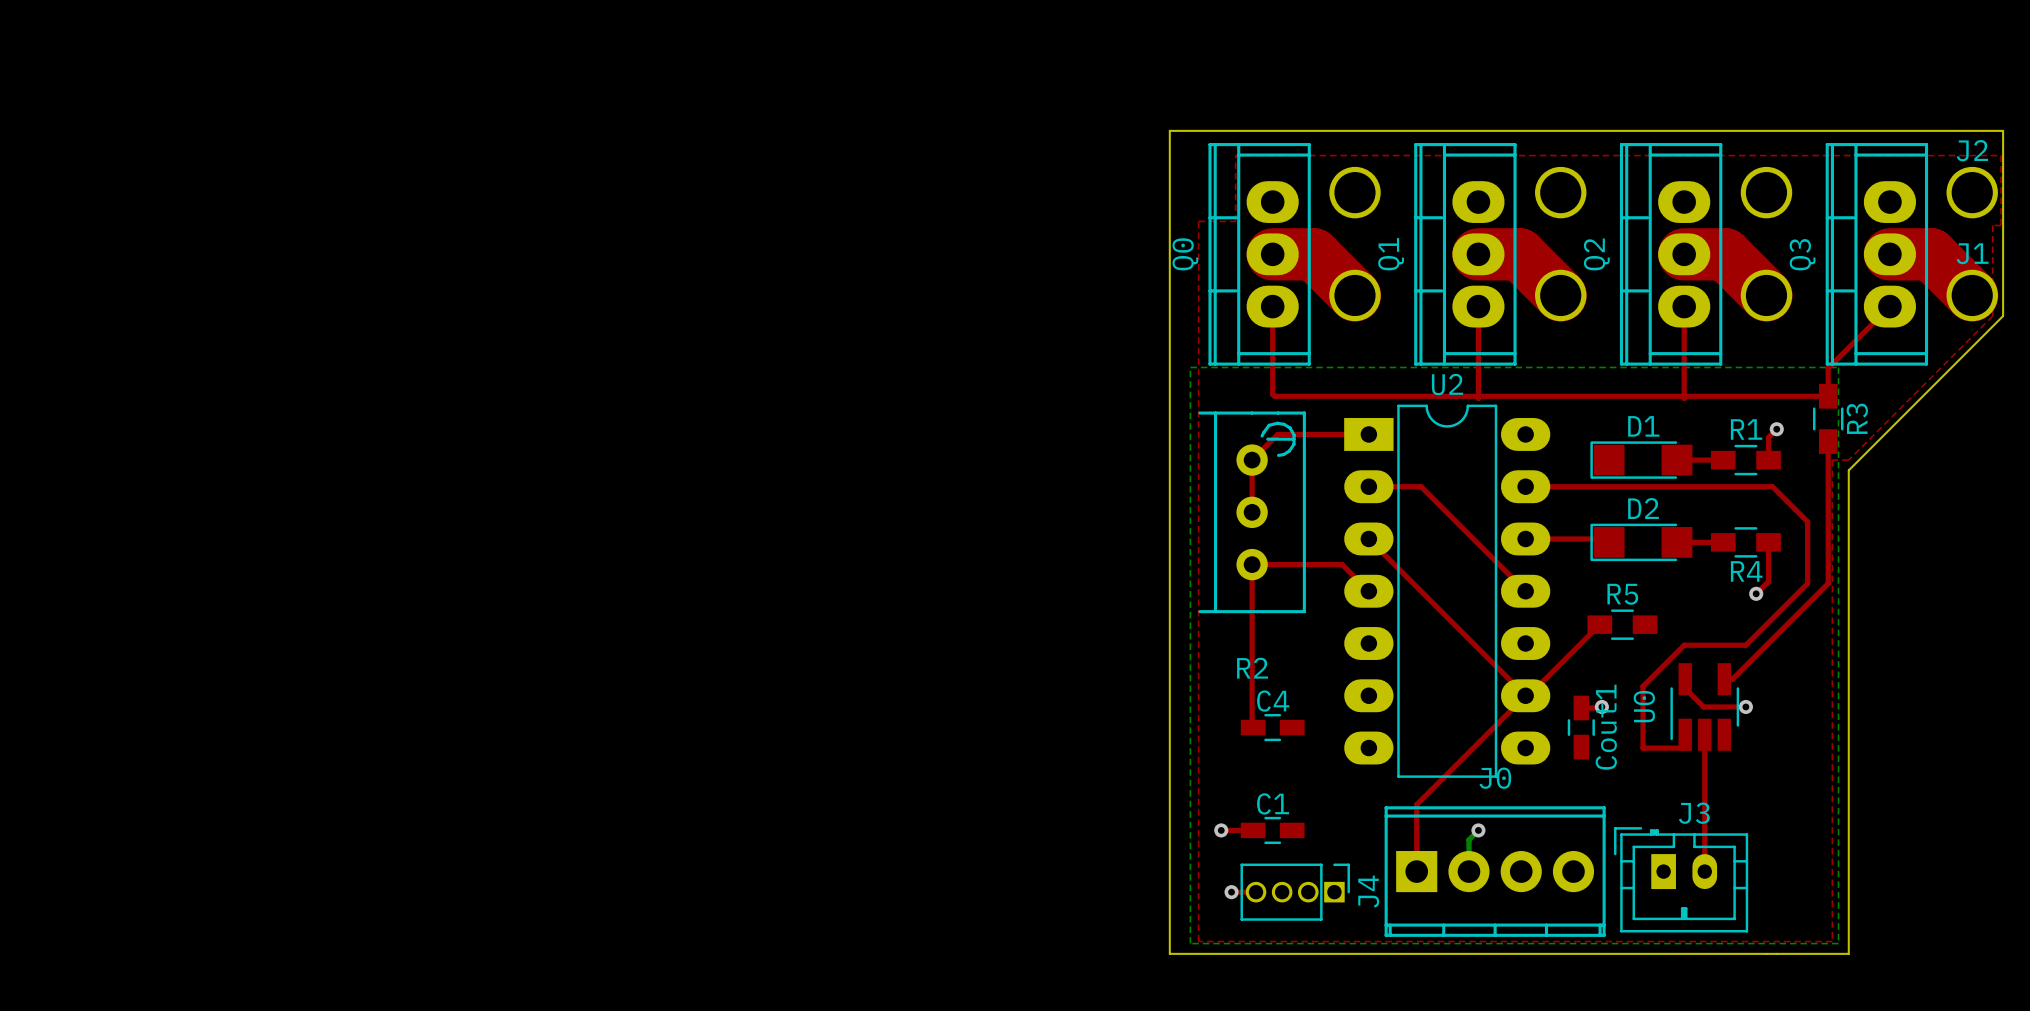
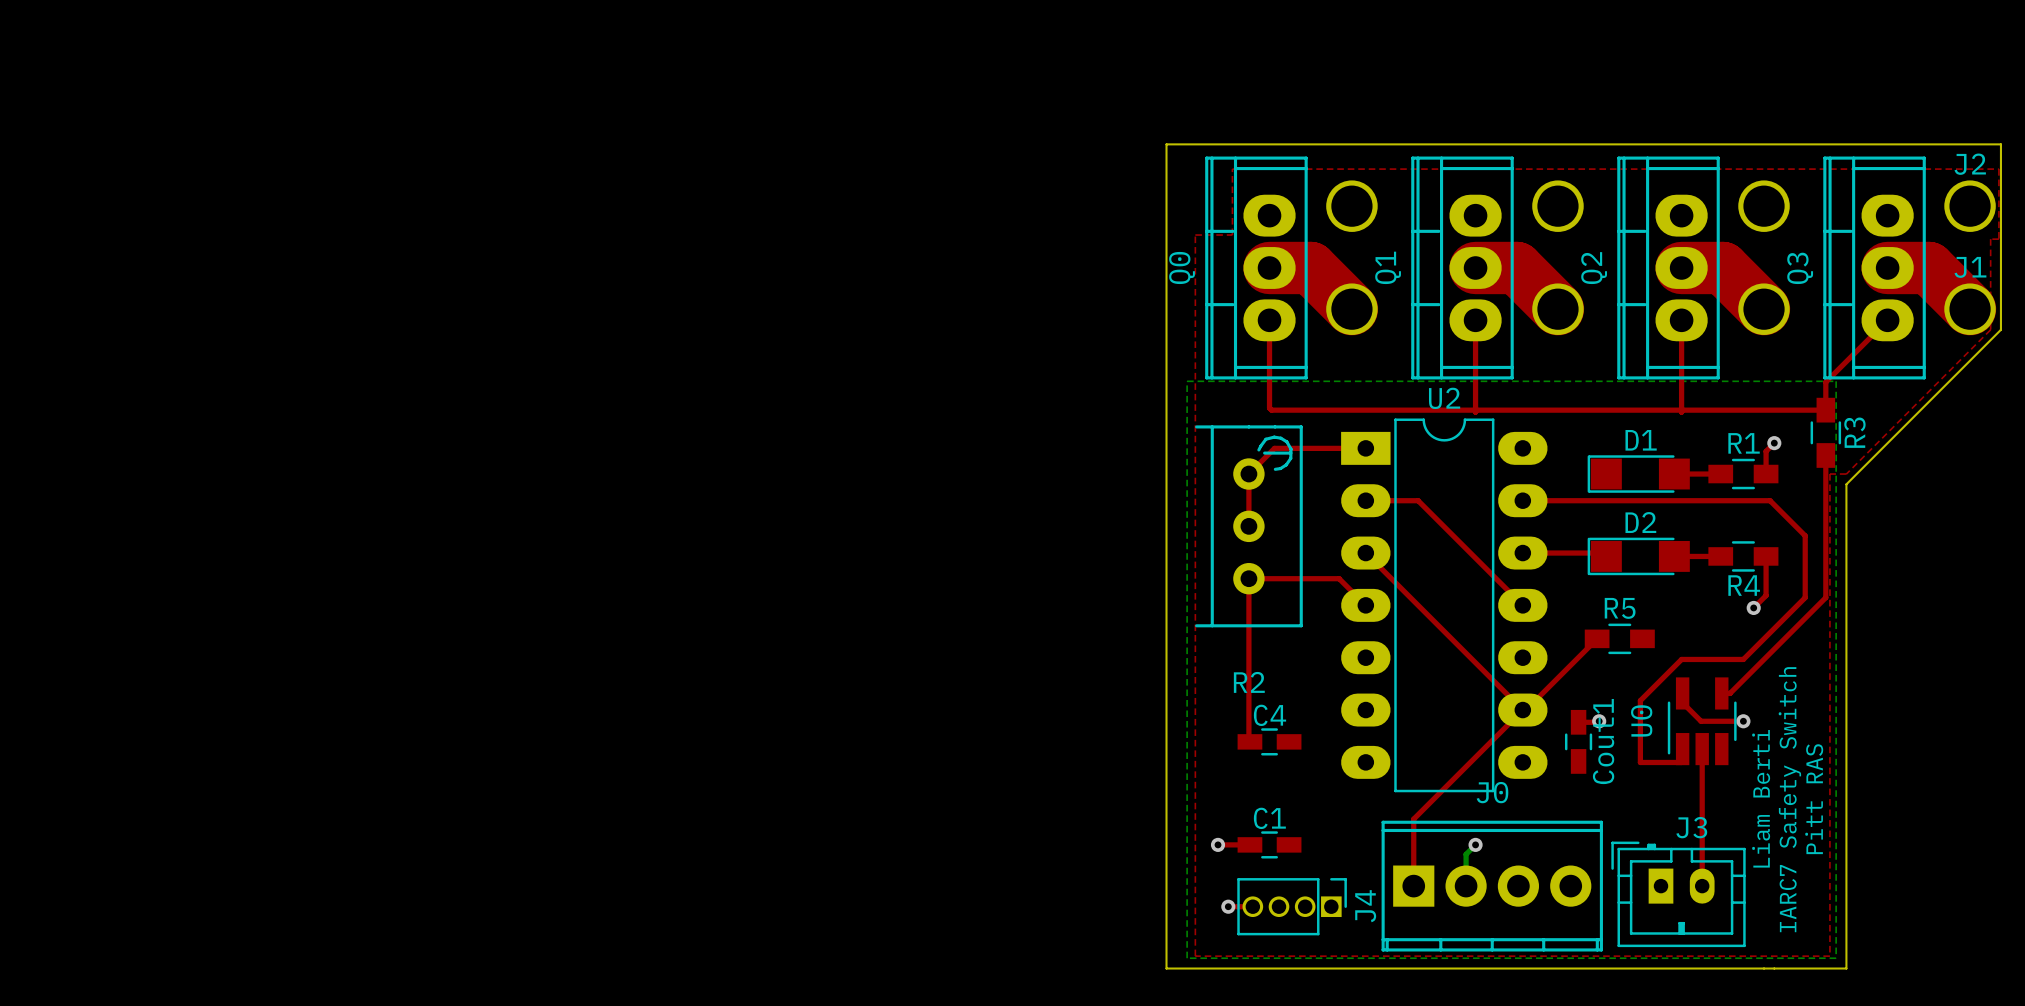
text: none -> Liam Berti (1761, 798)
text: none -> Pitt RAS (1814, 799)
text: none -> IARC7 Safety Switch (1789, 799)

